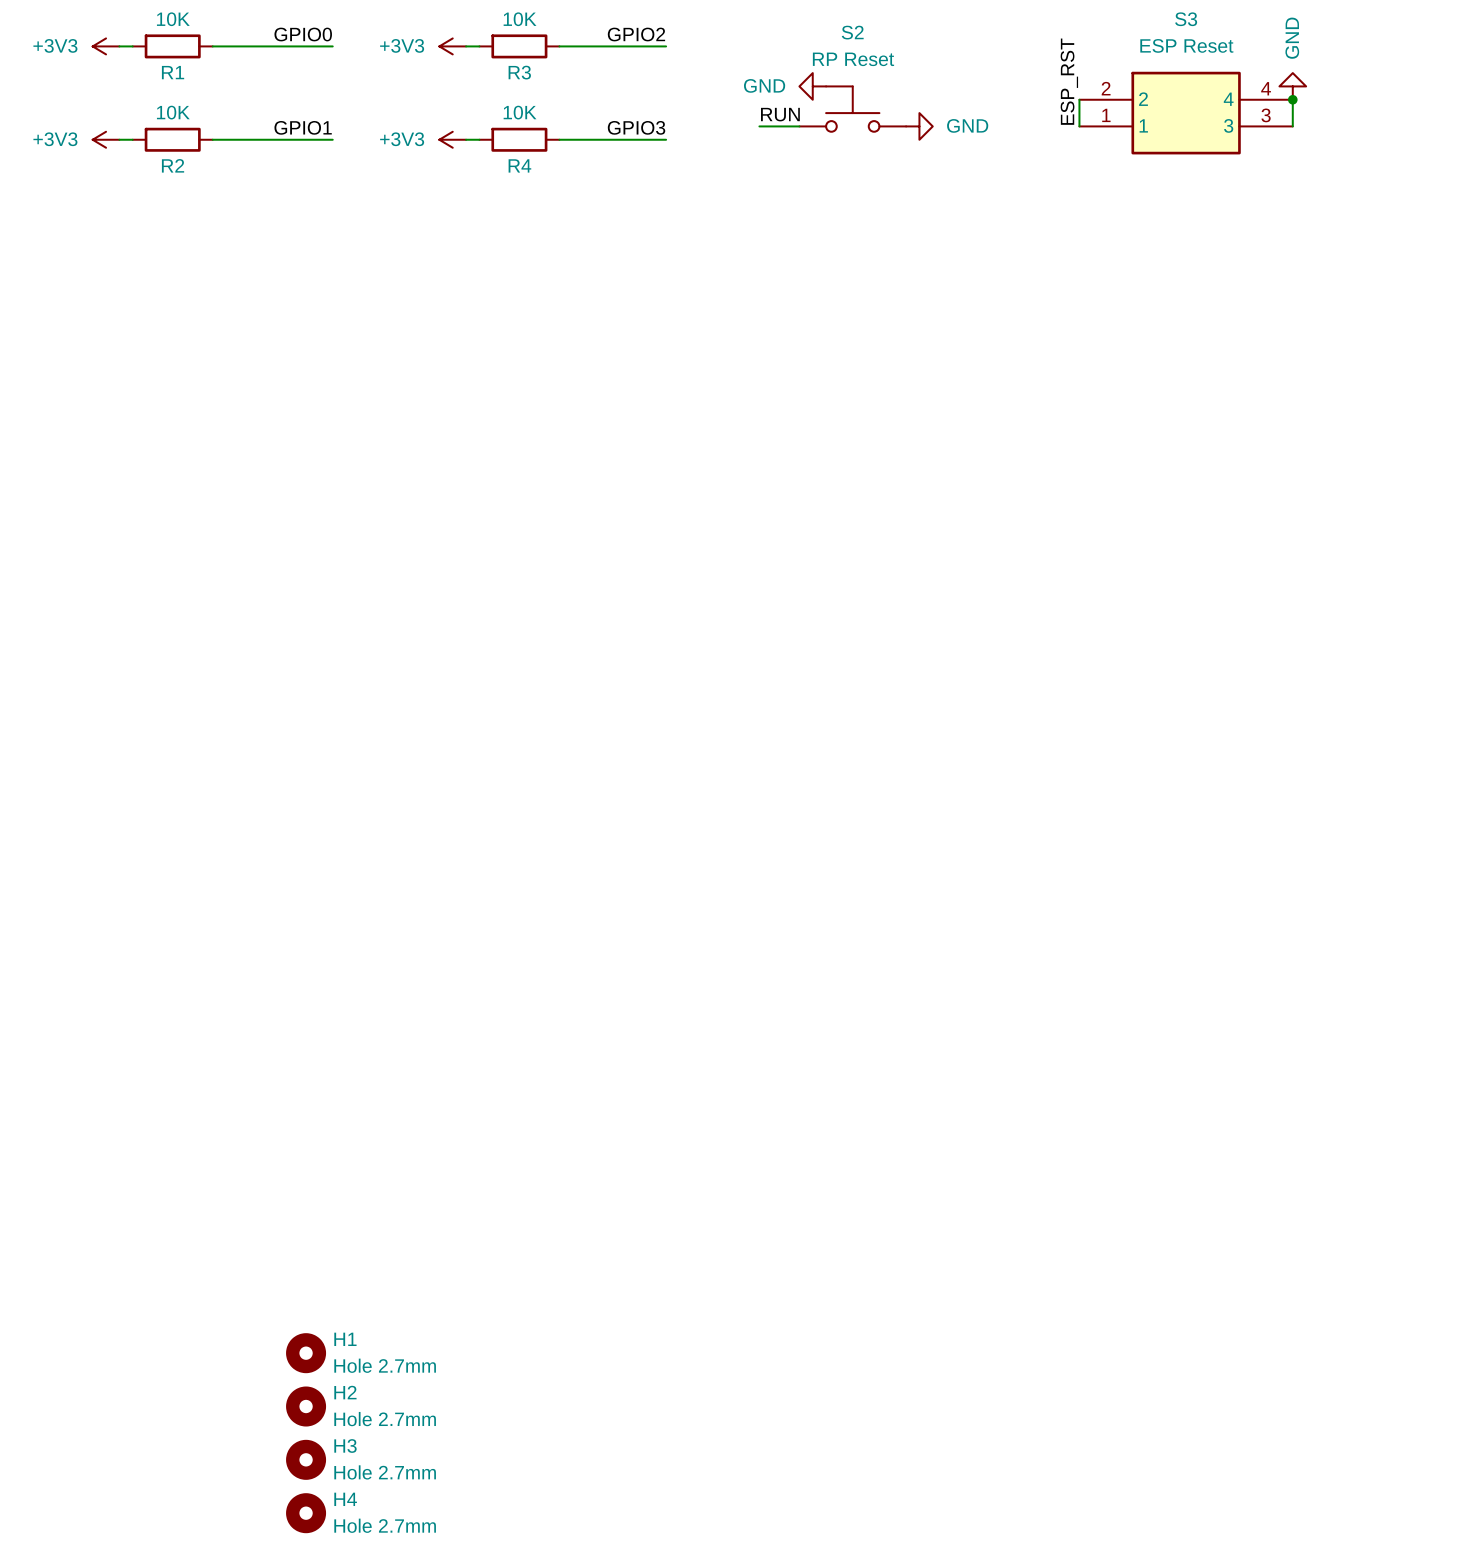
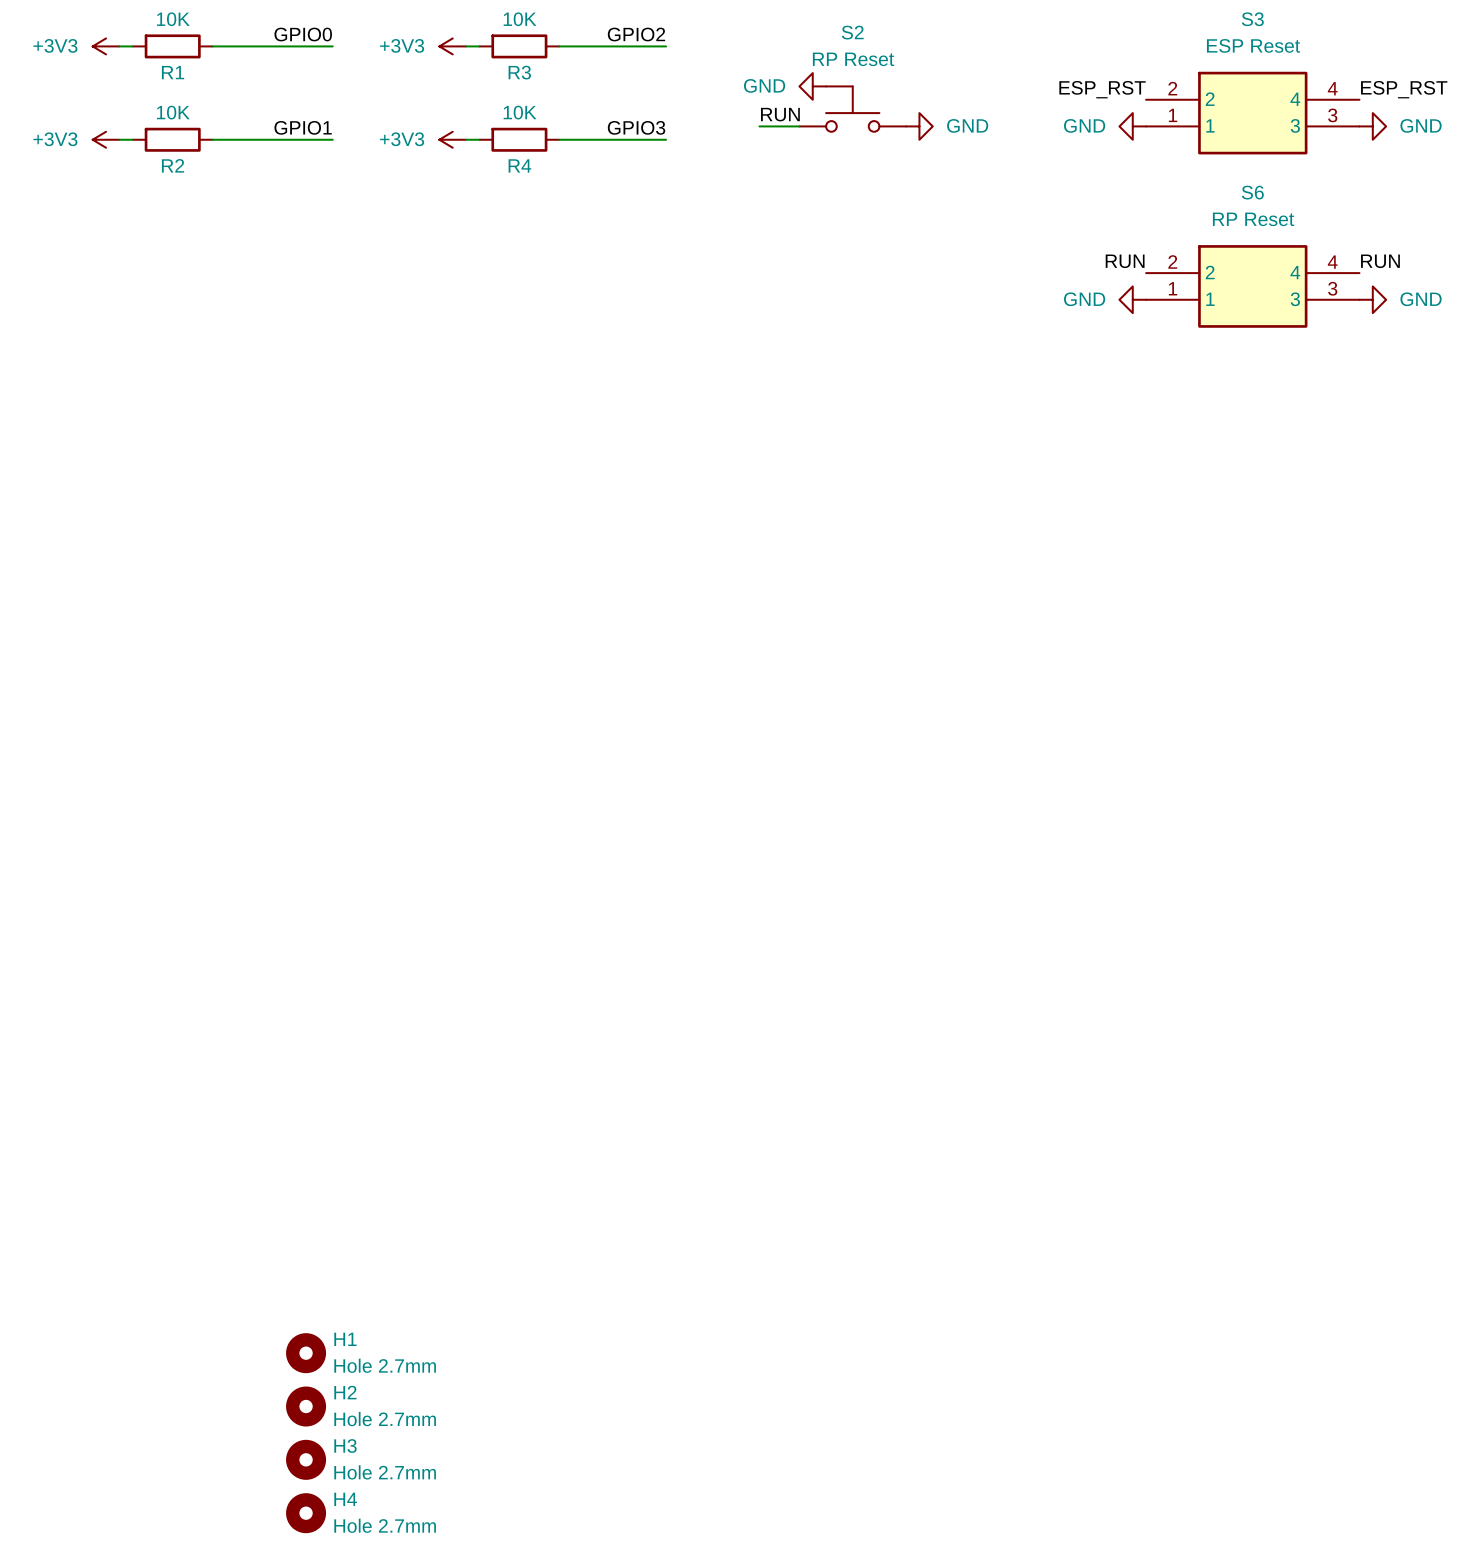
label rotation: 0° (1069, 81) -> 90° clockwise (1102, 89)
power symbol: GND (1292, 86) -> none
label: none -> ESP_RST (1404, 89)
wire: (1079, 99) (1079, 126) -> none
junction: (1292, 99) -> none
S3 position: (1186, 113) -> (1252, 113)
power symbol: none -> GND (1132, 126)
power symbol: none -> GND (1372, 126)
label: none -> RUN (1125, 261)
label: none -> RUN (1380, 261)
S6: none -> RP Reset (1252, 286)
power symbol: none -> GND (1132, 299)
power symbol: none -> GND (1372, 299)

